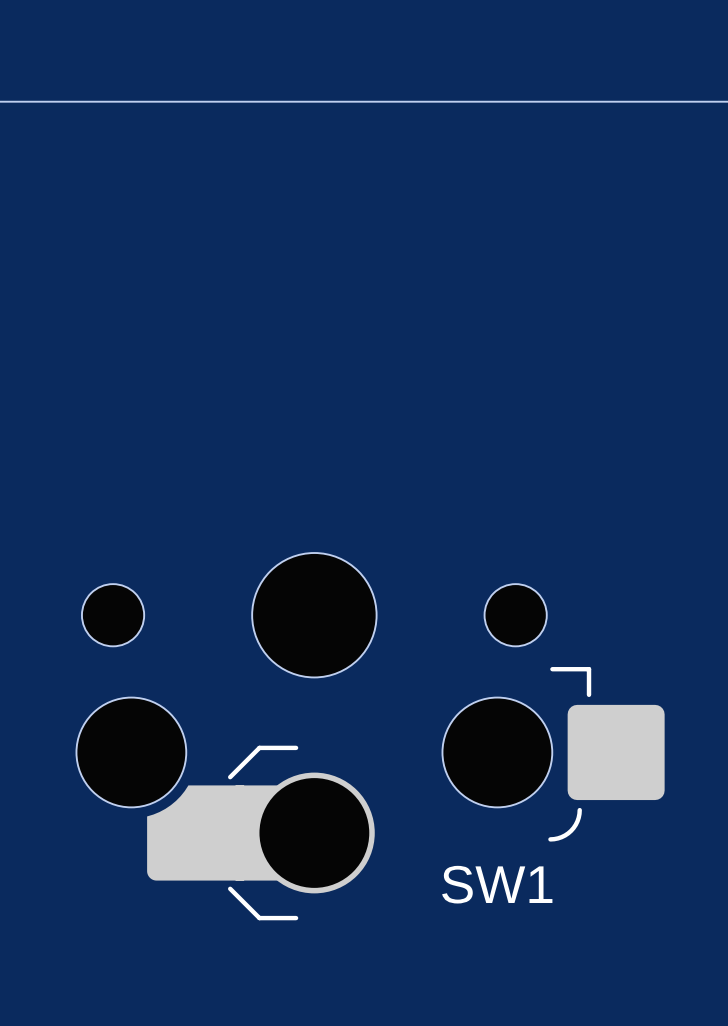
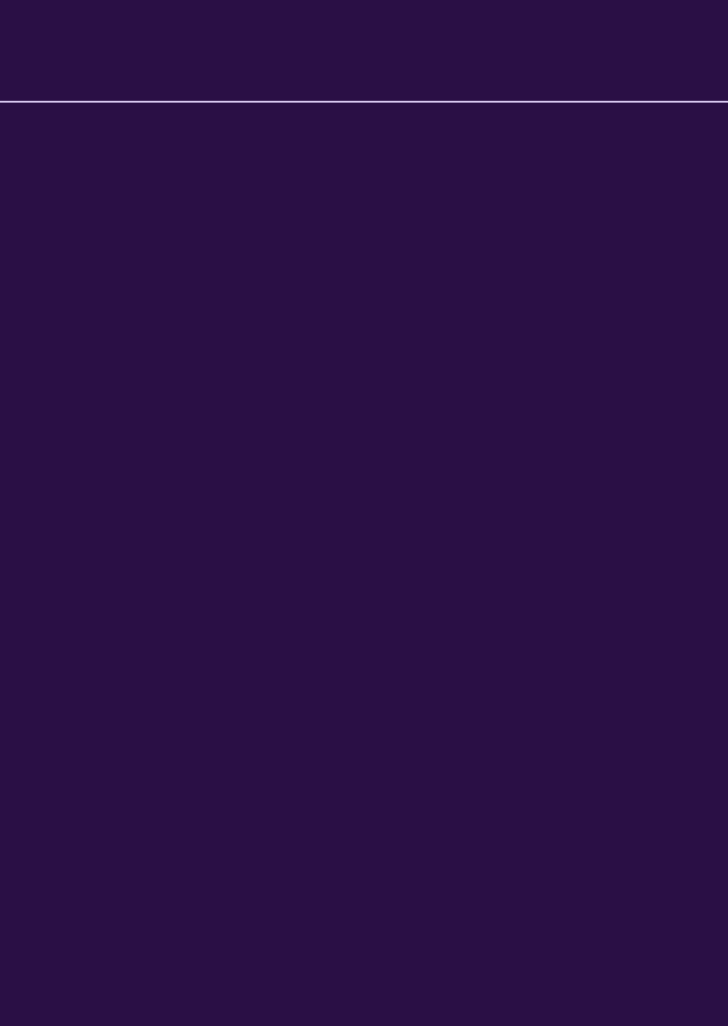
SW1: (370, 736) -> none

